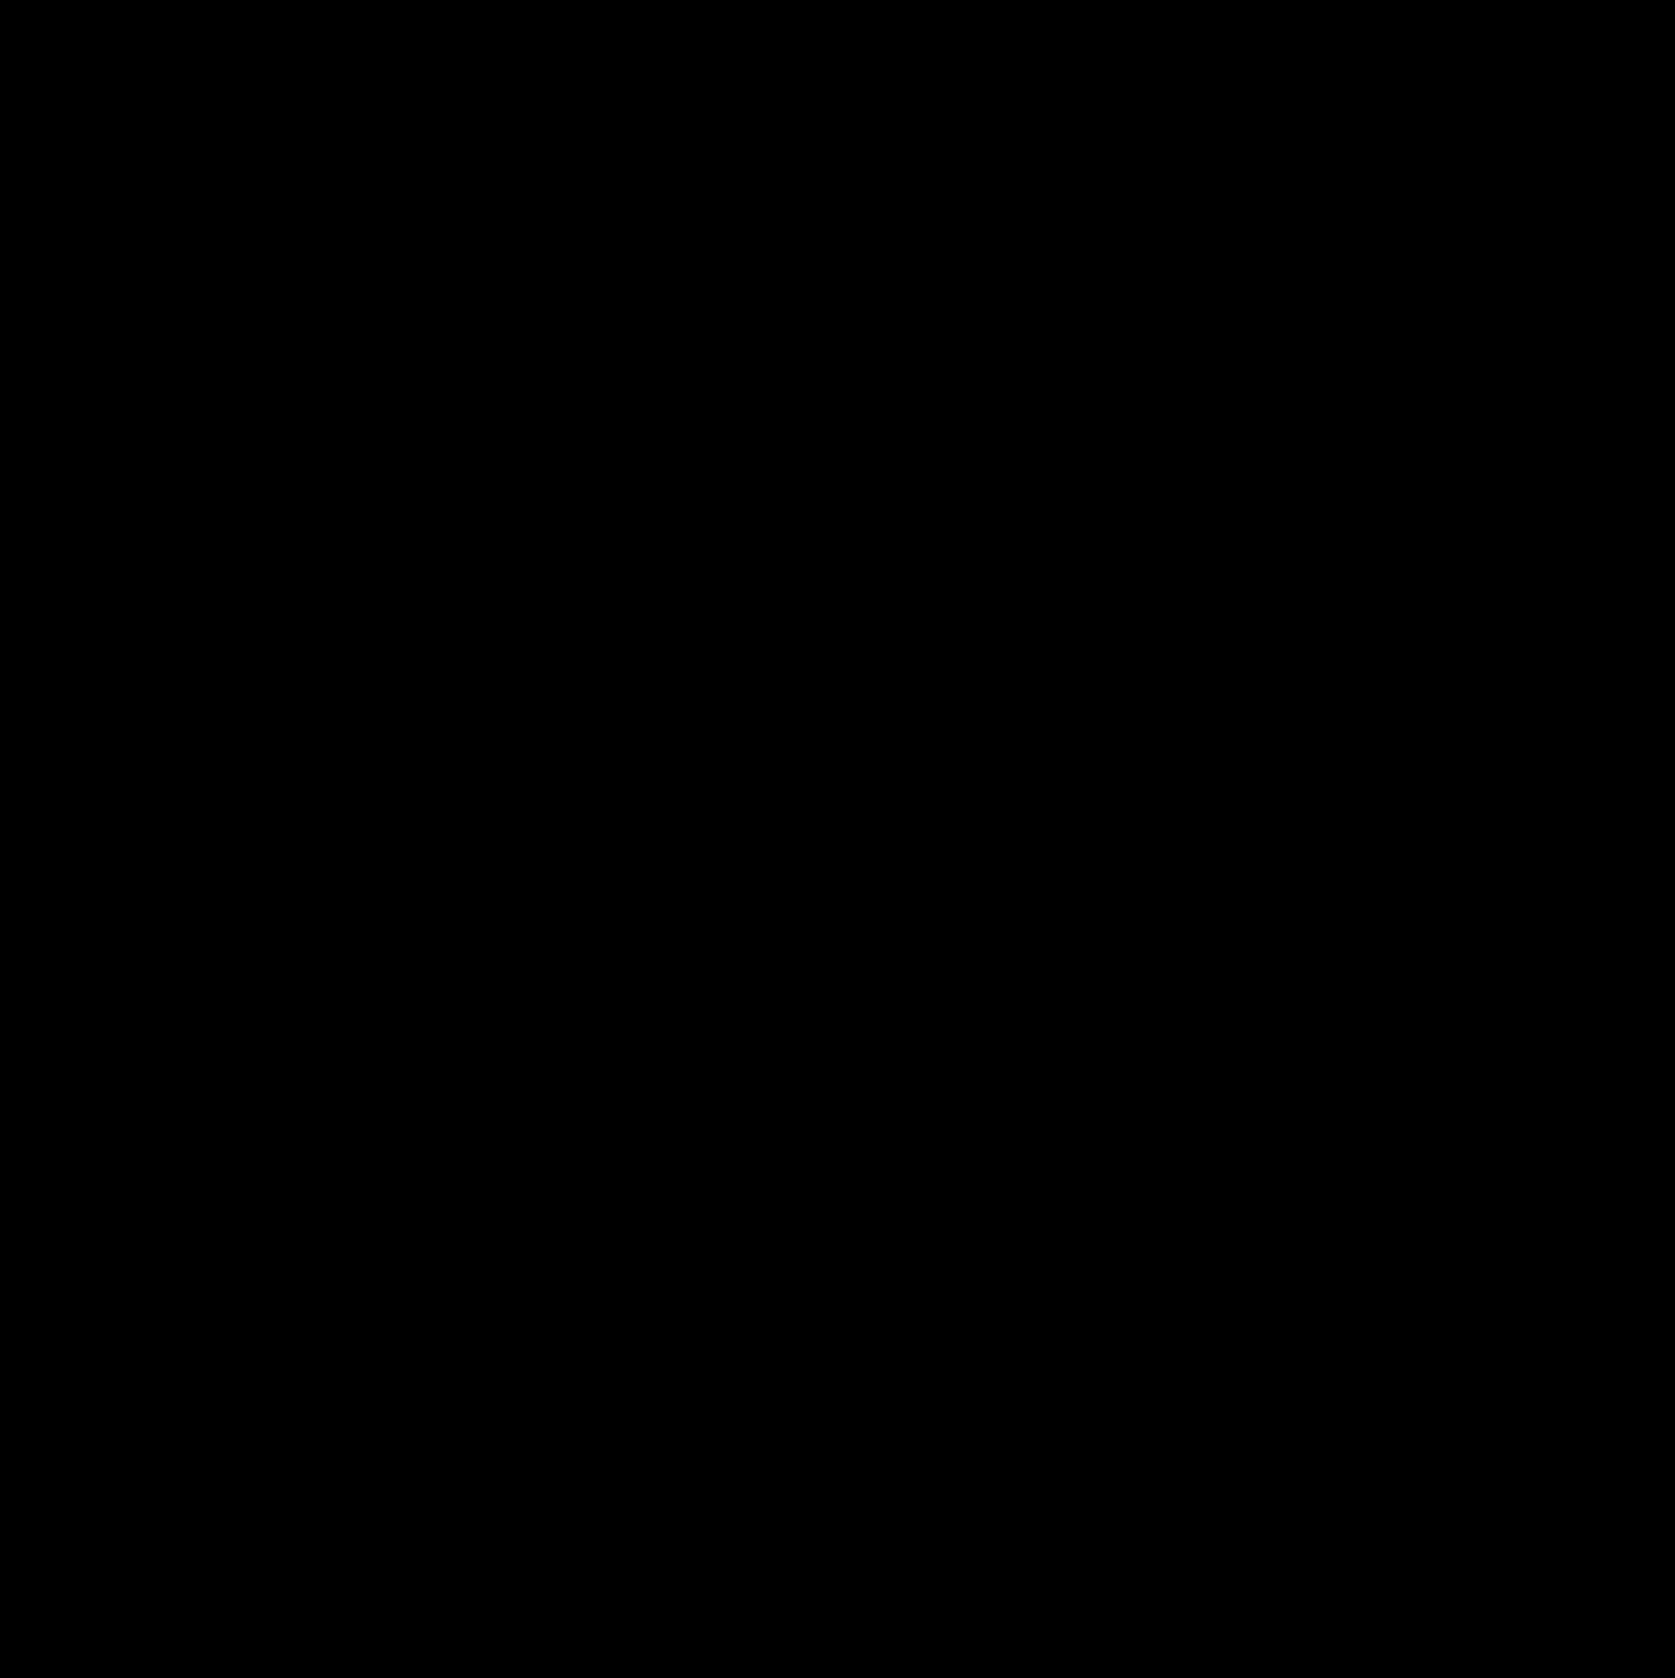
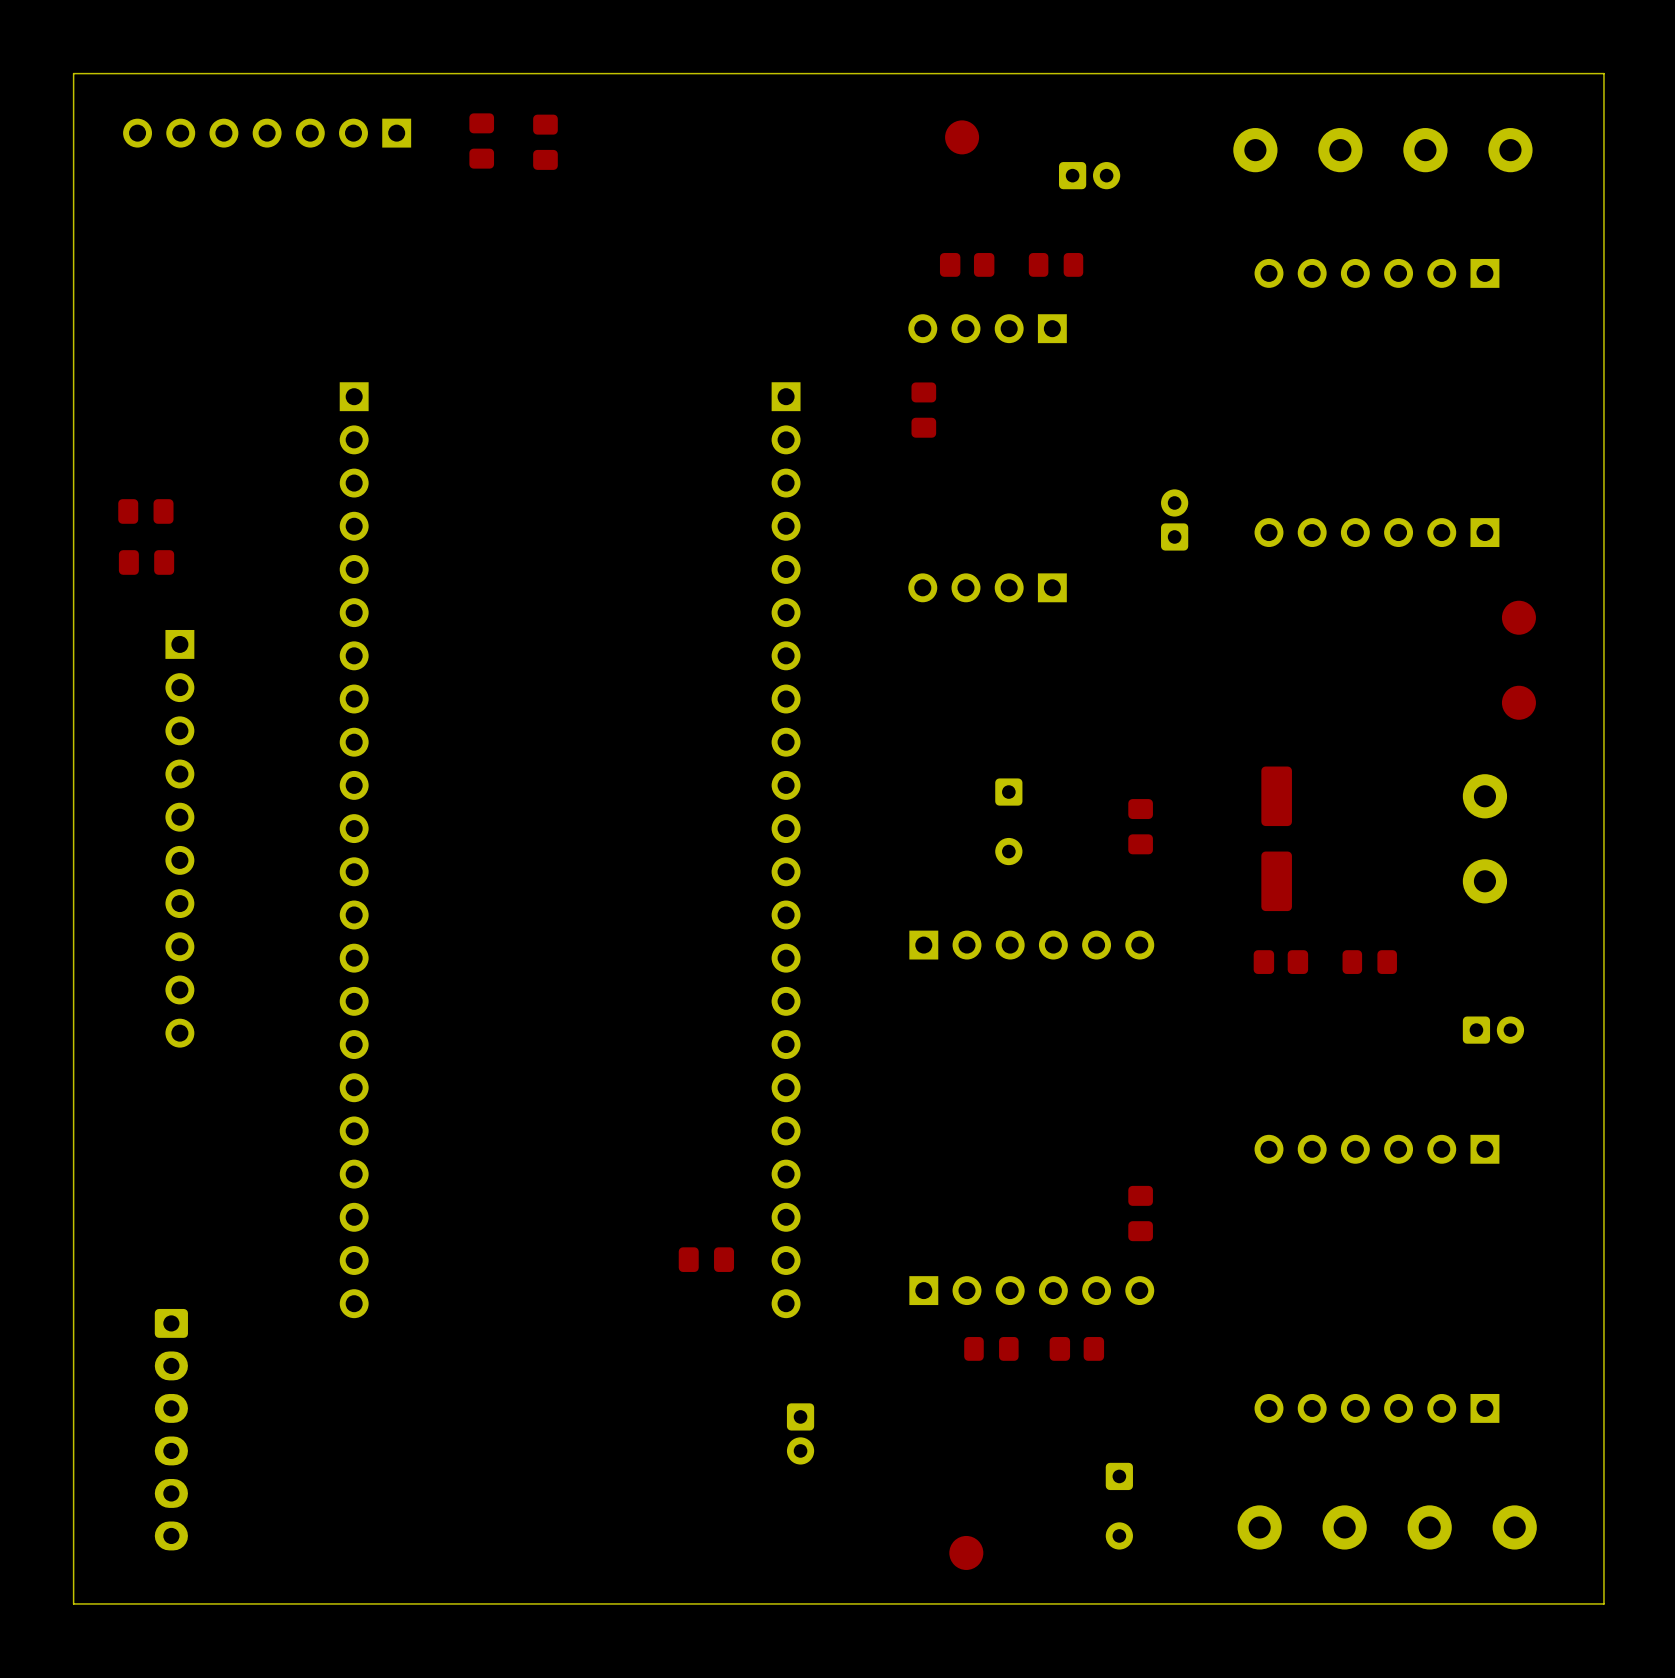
board edge: none -> (1603, 73) (73, 73) (73, 1603) (1603, 1603) (1603, 73)
part: none -> (267, 133)
part: none -> (962, 137)
part: none -> (481, 140)
part: none -> (545, 142)
part: none -> (1382, 150)
part: none -> (1089, 175)
part: none -> (967, 264)
part: none -> (1056, 264)
part: none -> (1376, 273)
part: none -> (987, 328)
part: none -> (923, 410)
part: none -> (145, 511)
part: none -> (1174, 519)
part: none -> (1376, 532)
part: none -> (146, 562)
part: none -> (987, 587)
part: none -> (1518, 617)
part: none -> (1518, 702)
part: none -> (1008, 821)
part: none -> (1140, 826)
part: none -> (179, 838)
part: none -> (1276, 838)
part: none -> (1484, 838)
part: none -> (354, 850)
part: none -> (786, 850)
part: none -> (1031, 945)
part: none -> (1280, 962)
part: none -> (1369, 962)
part: none -> (1493, 1030)
part: none -> (1376, 1149)
part: none -> (1140, 1213)
part: none -> (706, 1259)
part: none -> (1031, 1290)
part: none -> (991, 1348)
part: none -> (1076, 1348)
part: none -> (1376, 1408)
part: none -> (171, 1429)
part: none -> (800, 1433)
part: none -> (1119, 1506)
part: none -> (1387, 1527)
part: none -> (966, 1552)

